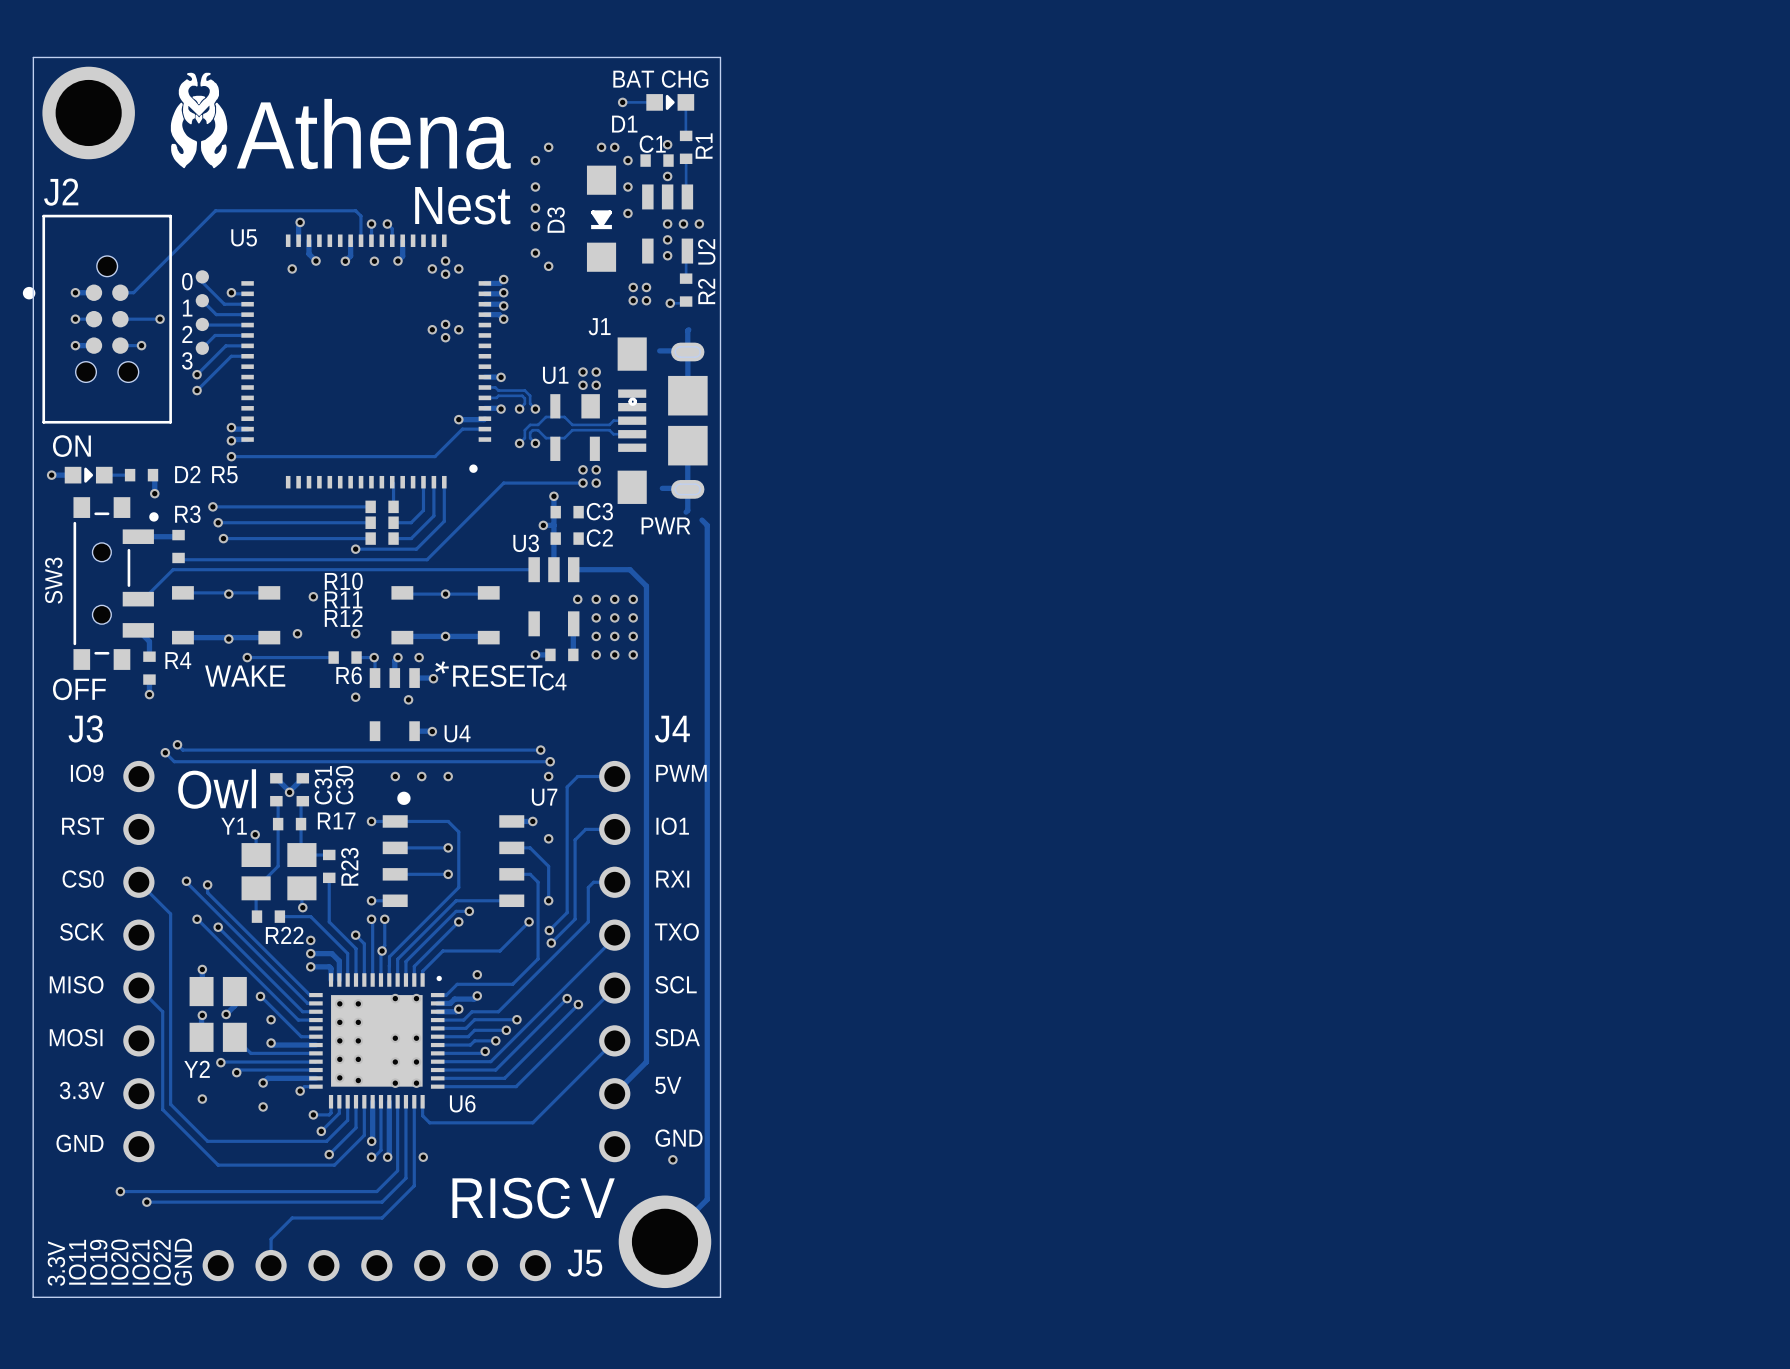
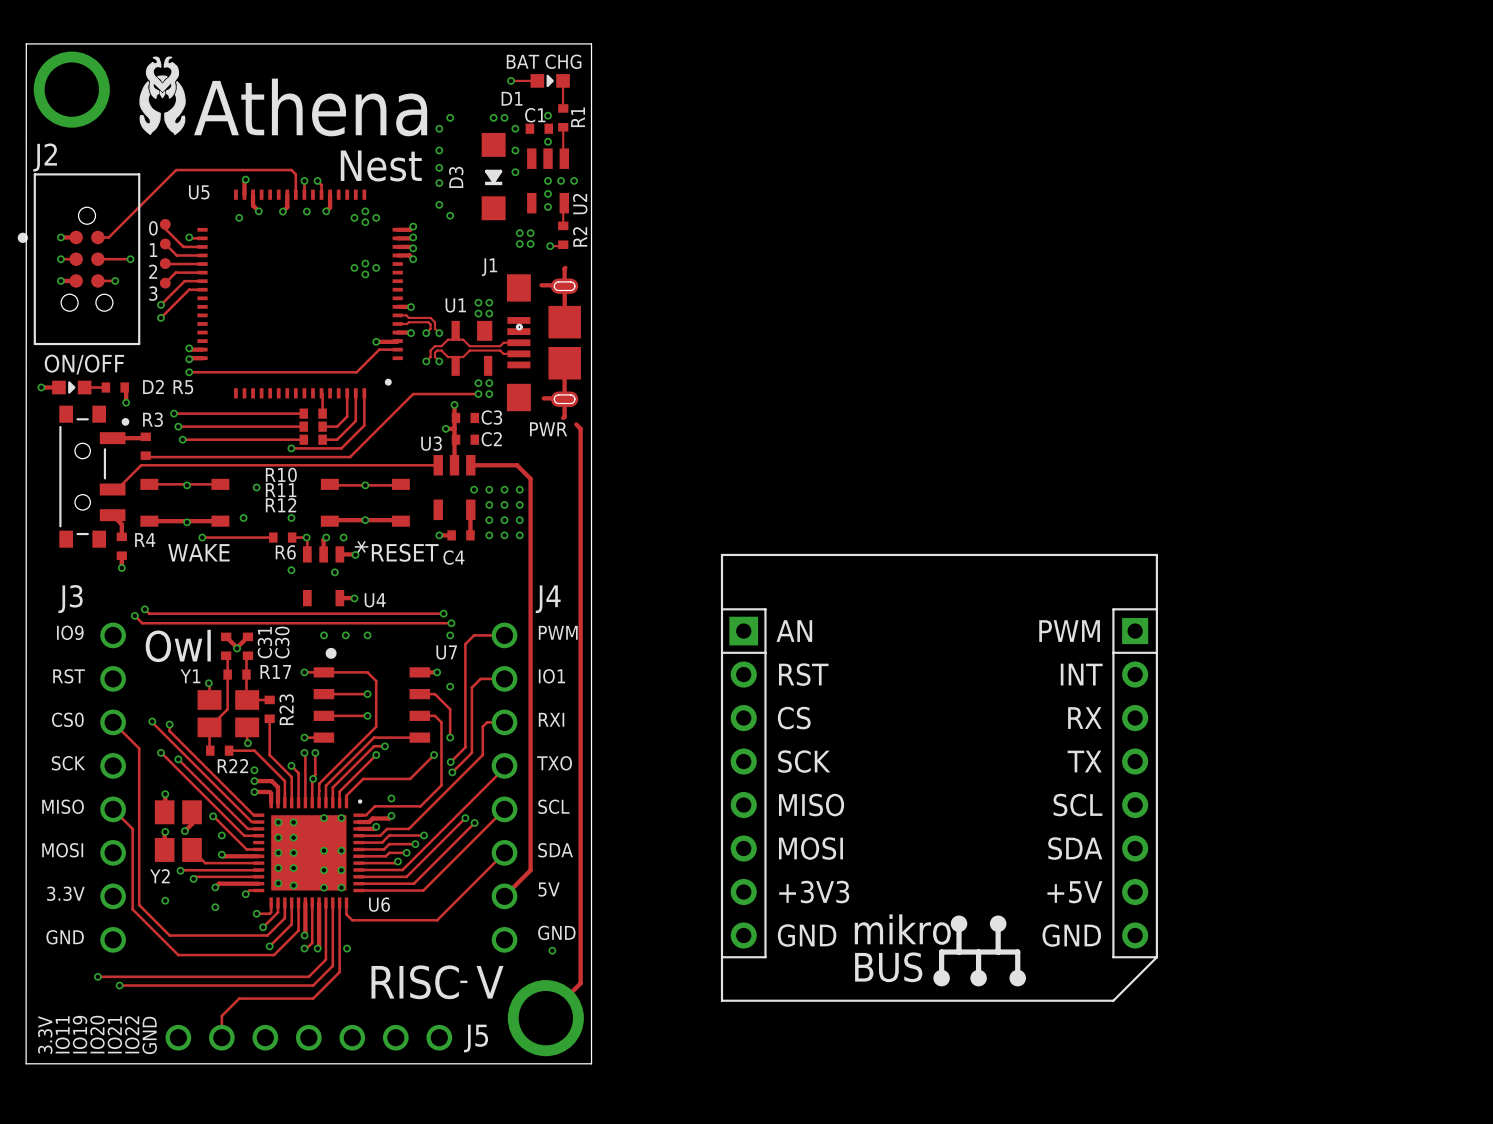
text: ON (71, 446) -> none
SW3 name: SW3 (53, 580) -> ON/OFF (84, 364)
text: OFF (79, 689) -> none
part: none -> (939, 777)

